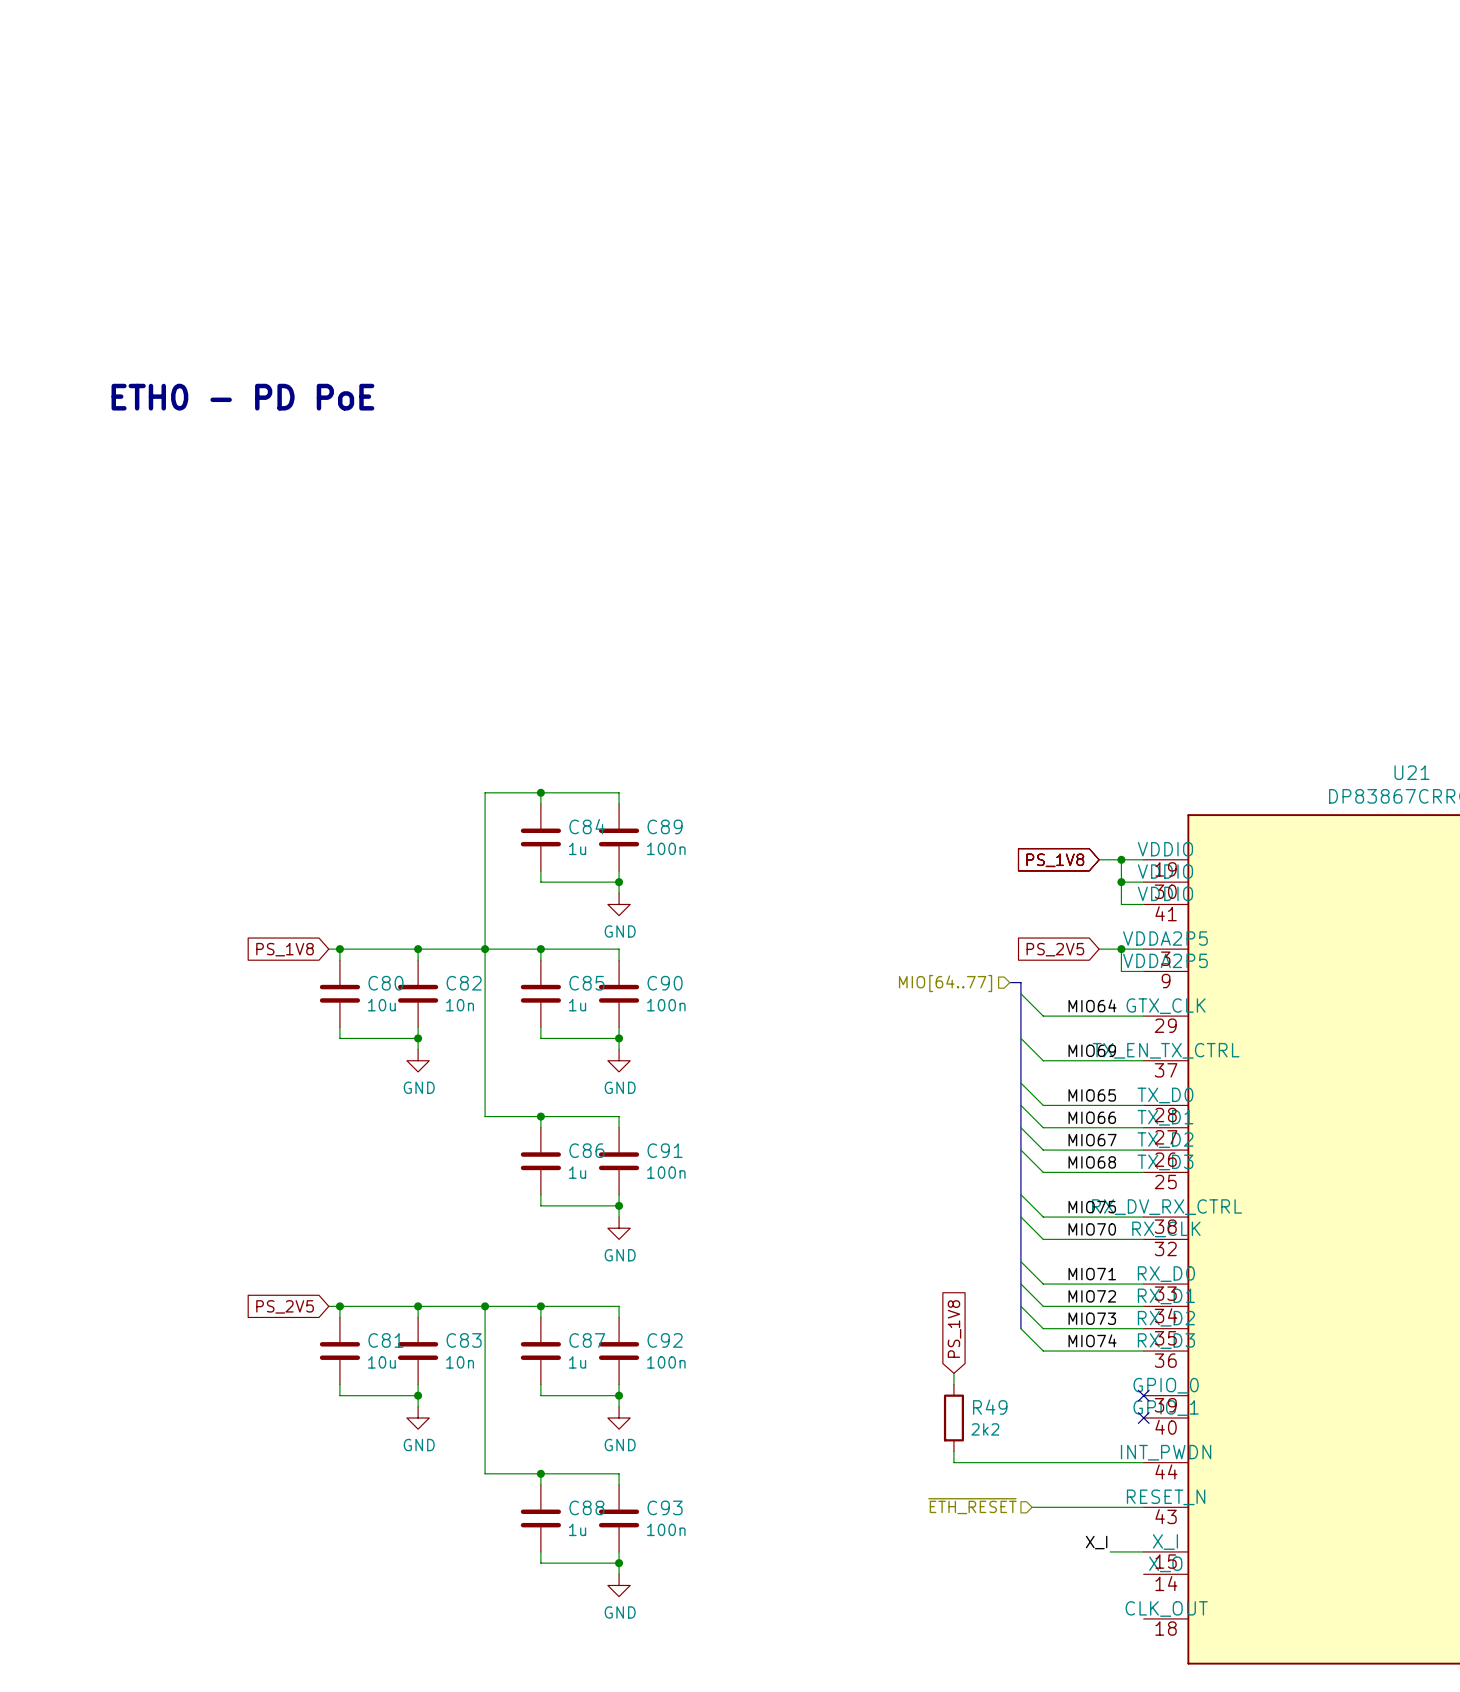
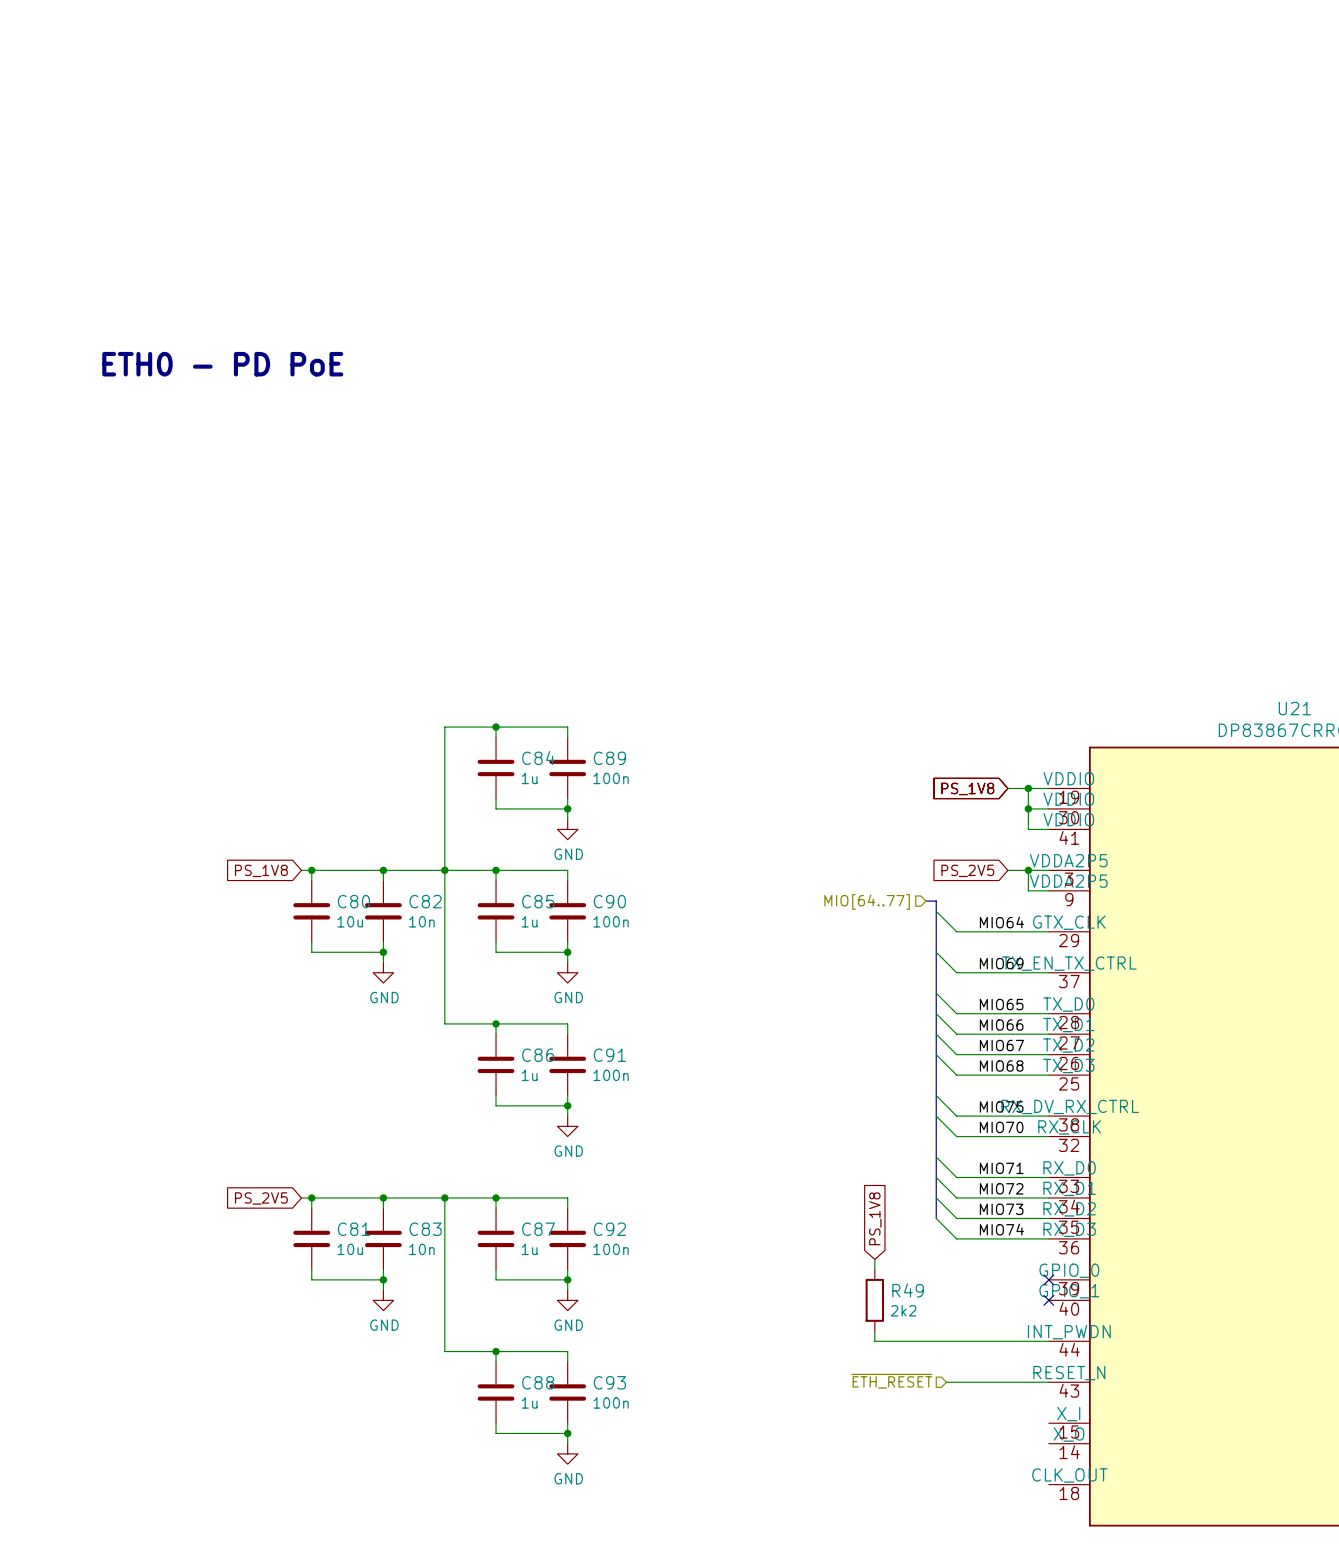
label: X_I (1096, 1542) -> none
wire: (1110, 1551) (1143, 1551) -> none

